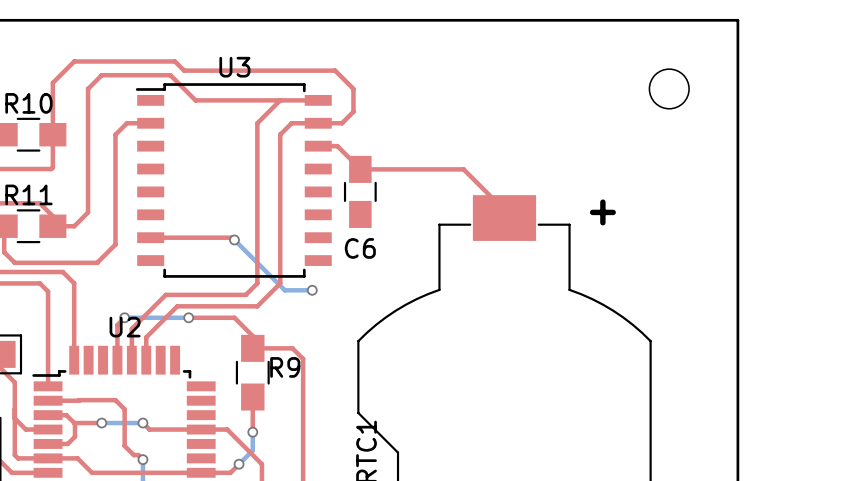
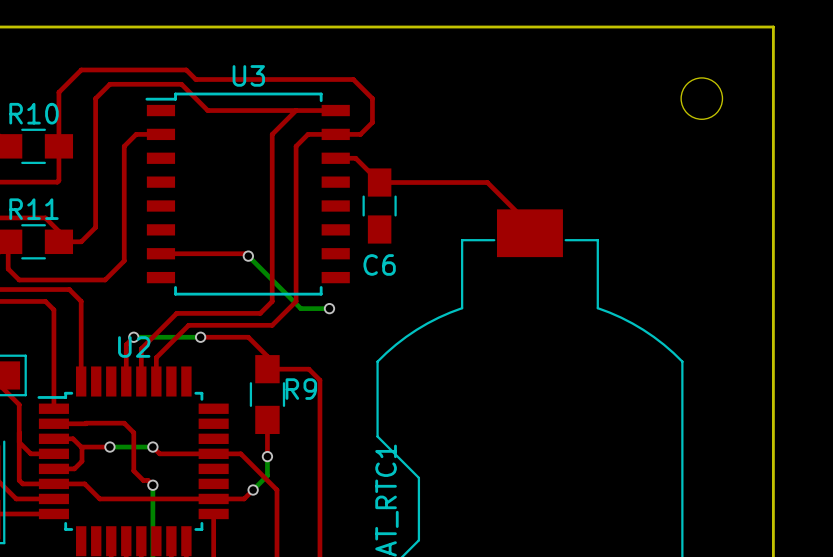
text: + (602, 212) -> none

